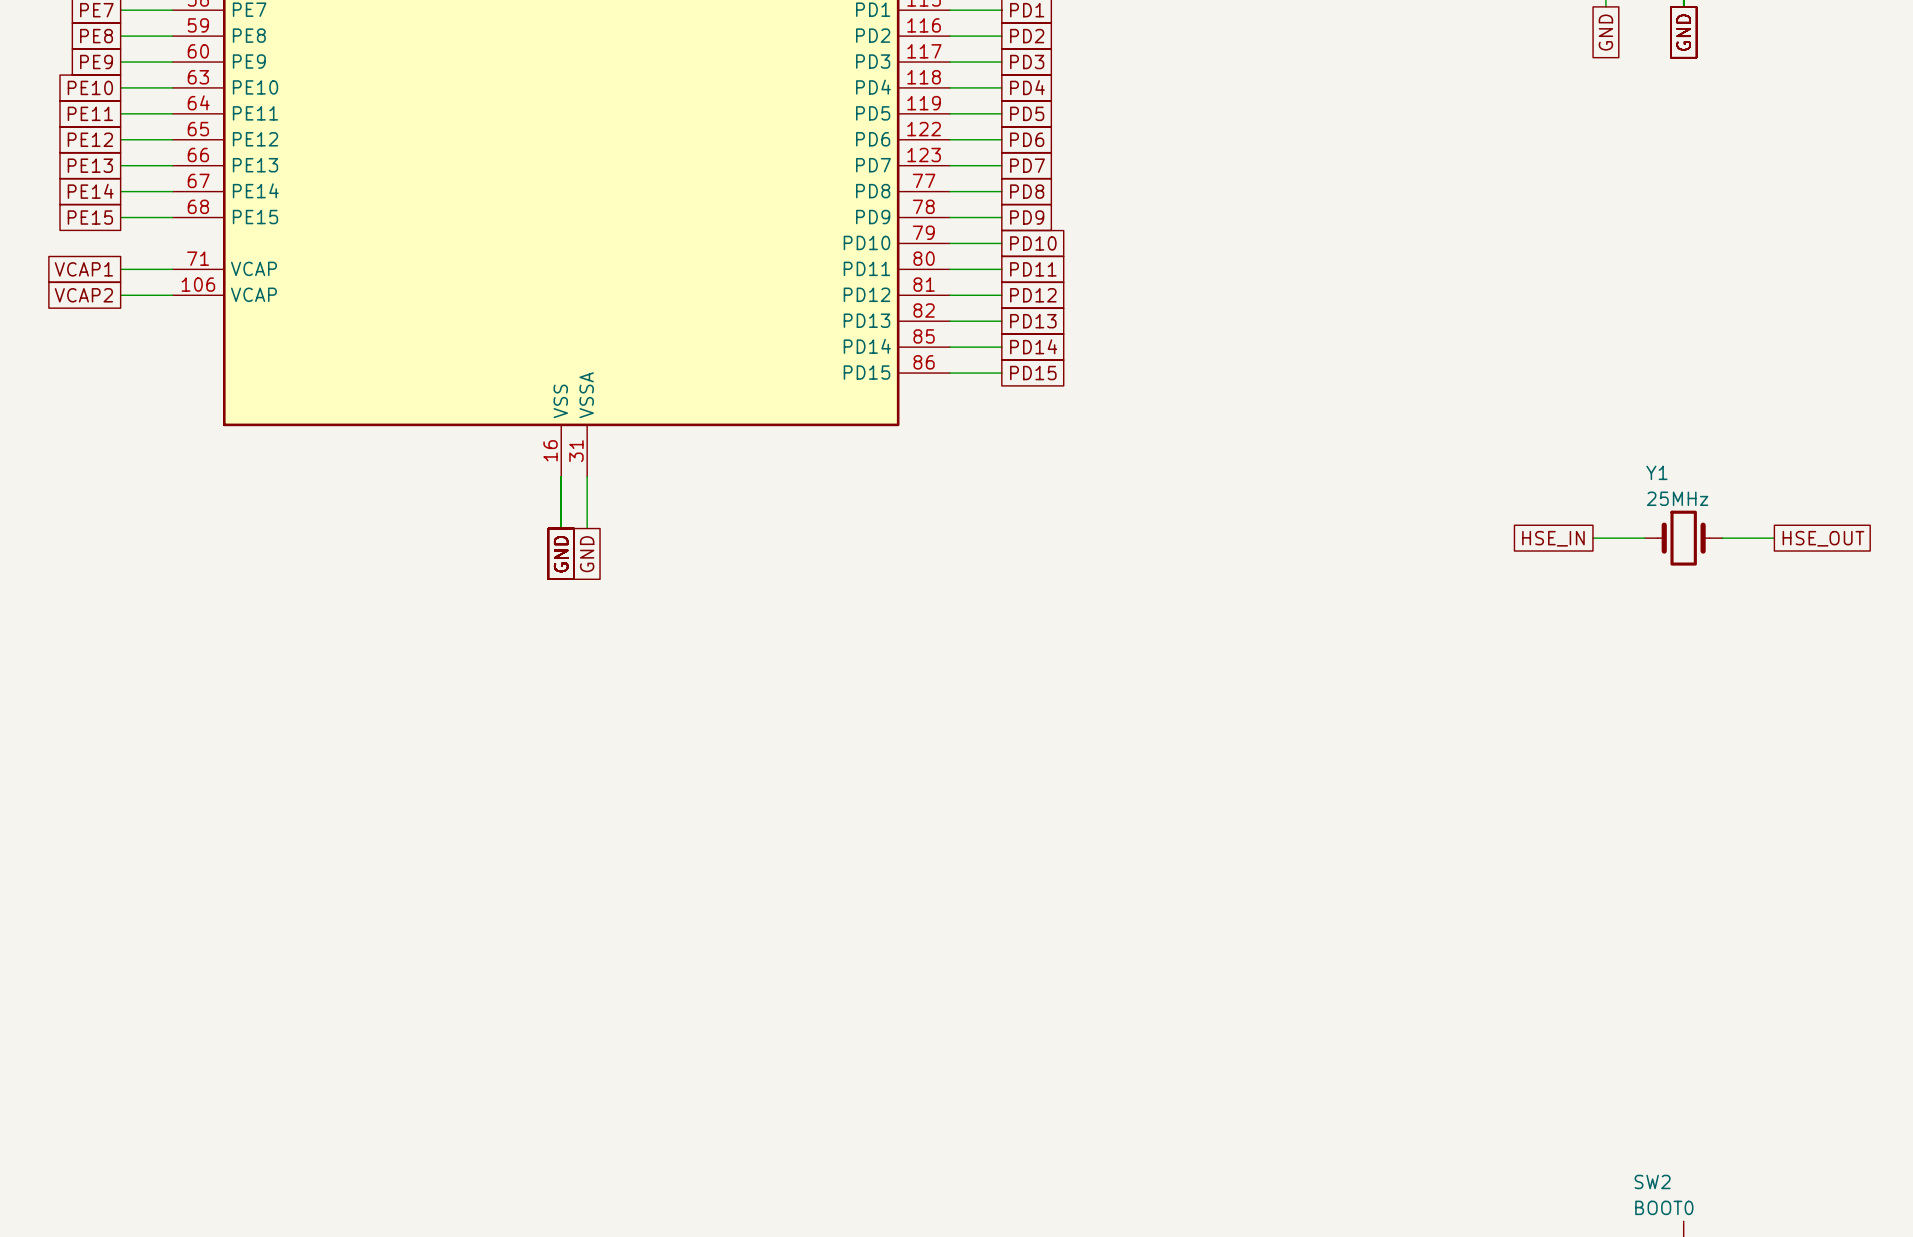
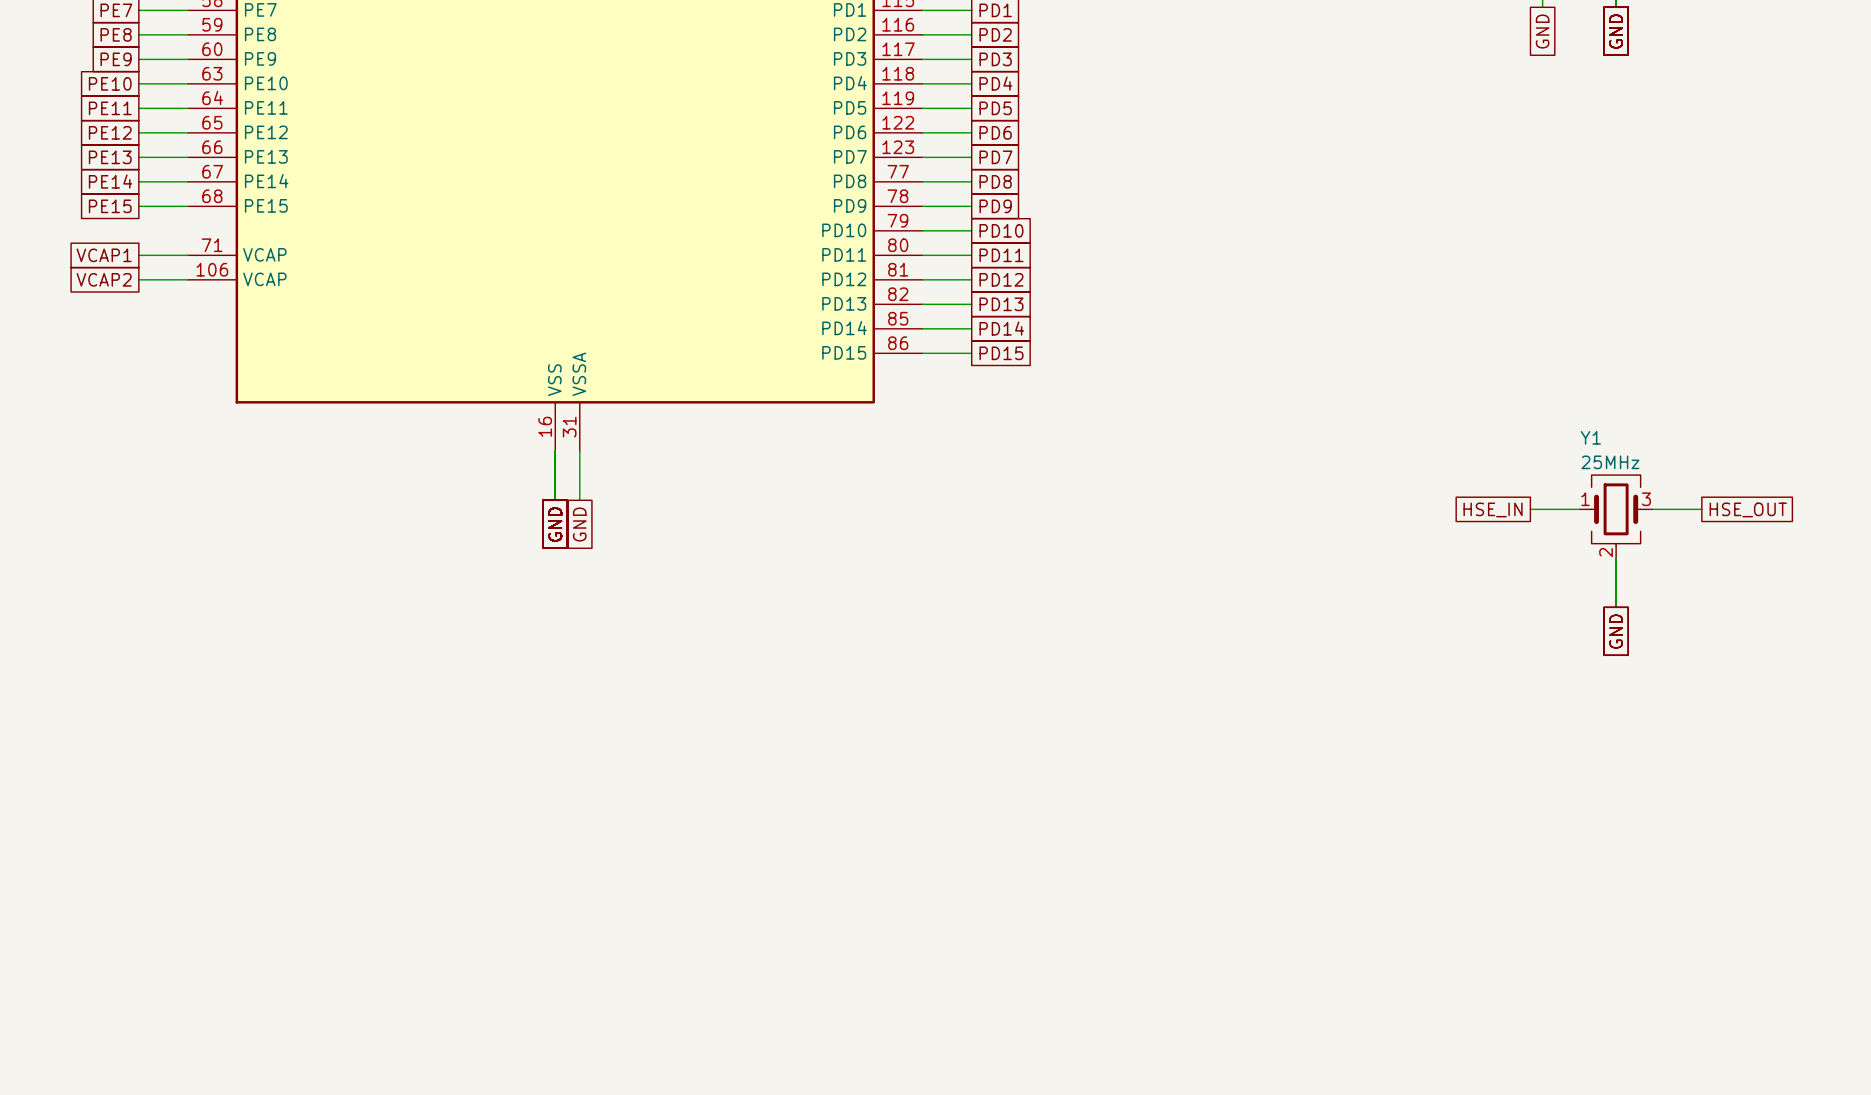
Y1 symbol: [1644, 510, 1723, 566] -> [1579, 475, 1653, 559]
wire: none -> (1616, 558) (1616, 607)
global label: none -> GND (1616, 631)

